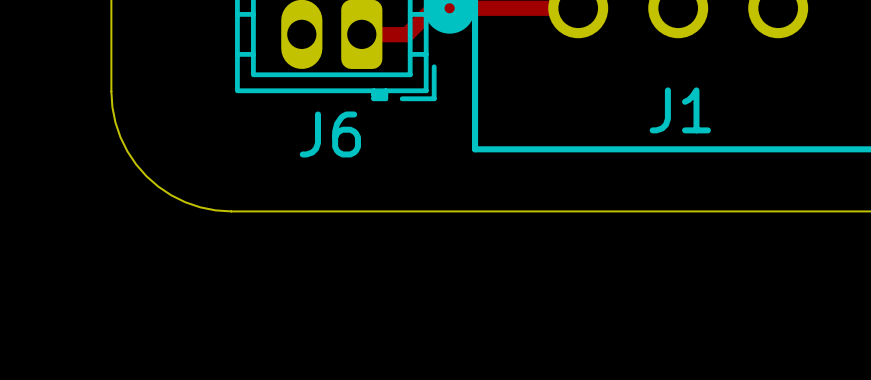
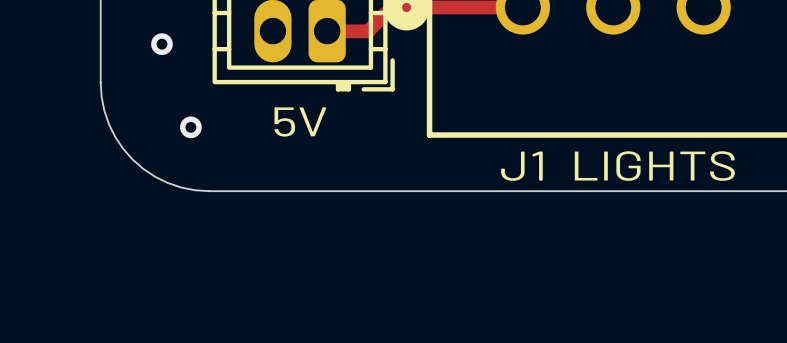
via: none -> (161, 44)
J1 name position: J1 (680, 110) -> J1 (521, 166)
J6 name: J6 (330, 134) -> 5V (300, 122)
via: none -> (190, 127)
text: none -> LIGHTS (654, 166)

